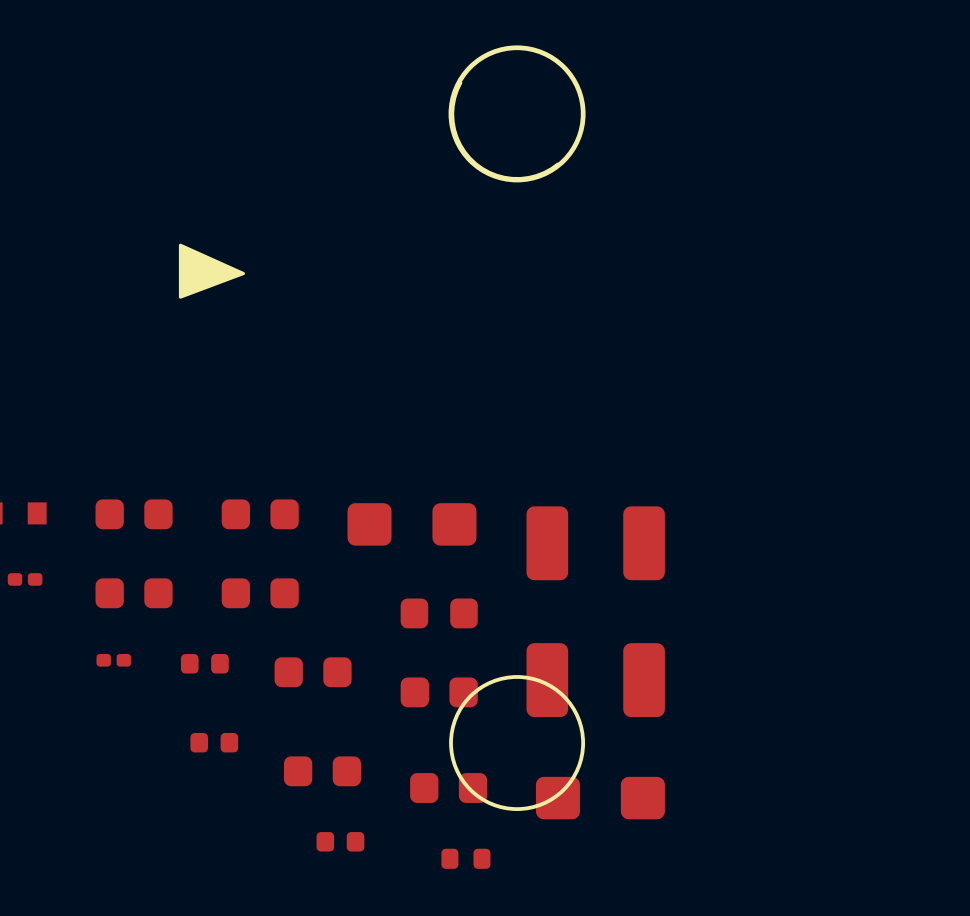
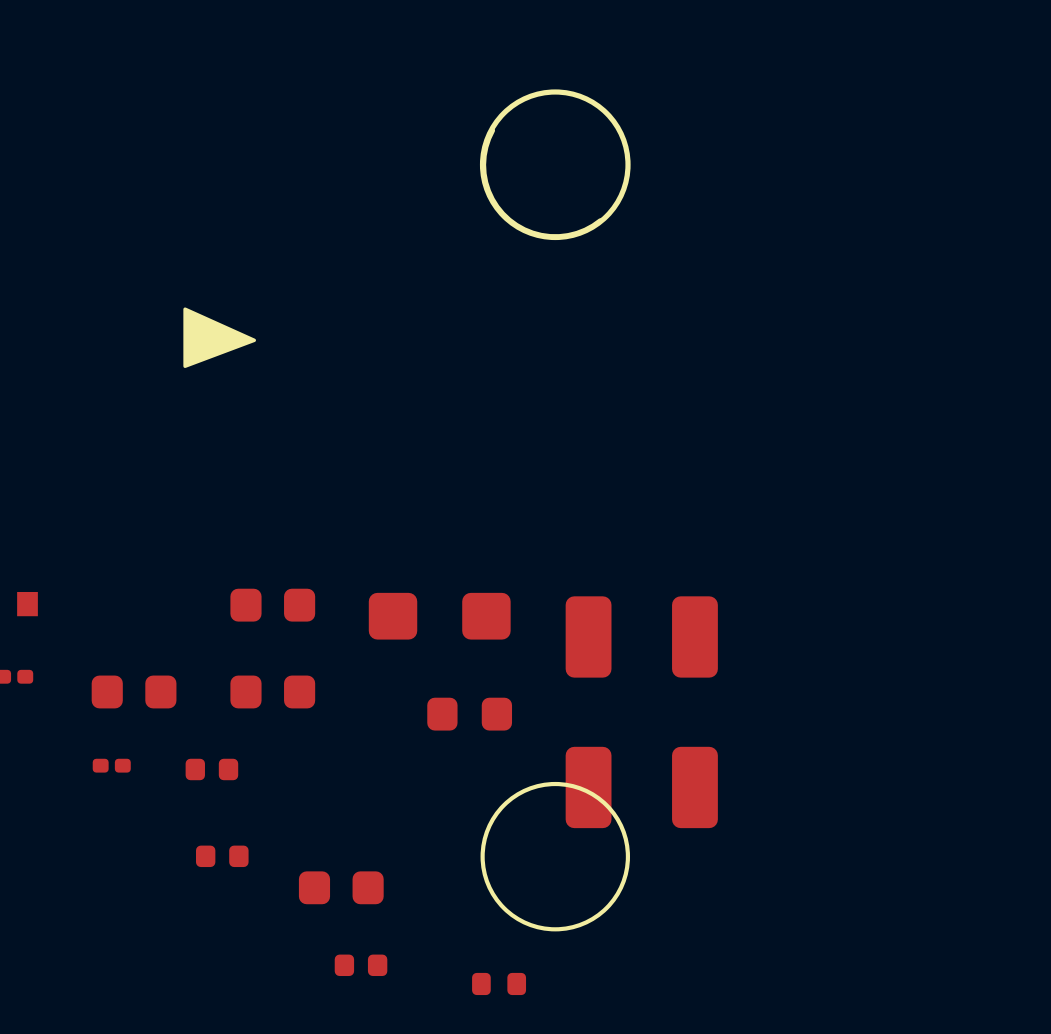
part: (134, 514) -> none
part: (313, 672) -> none
part: (439, 692) -> none
part: (448, 788) -> none
part: (600, 798) -> none

